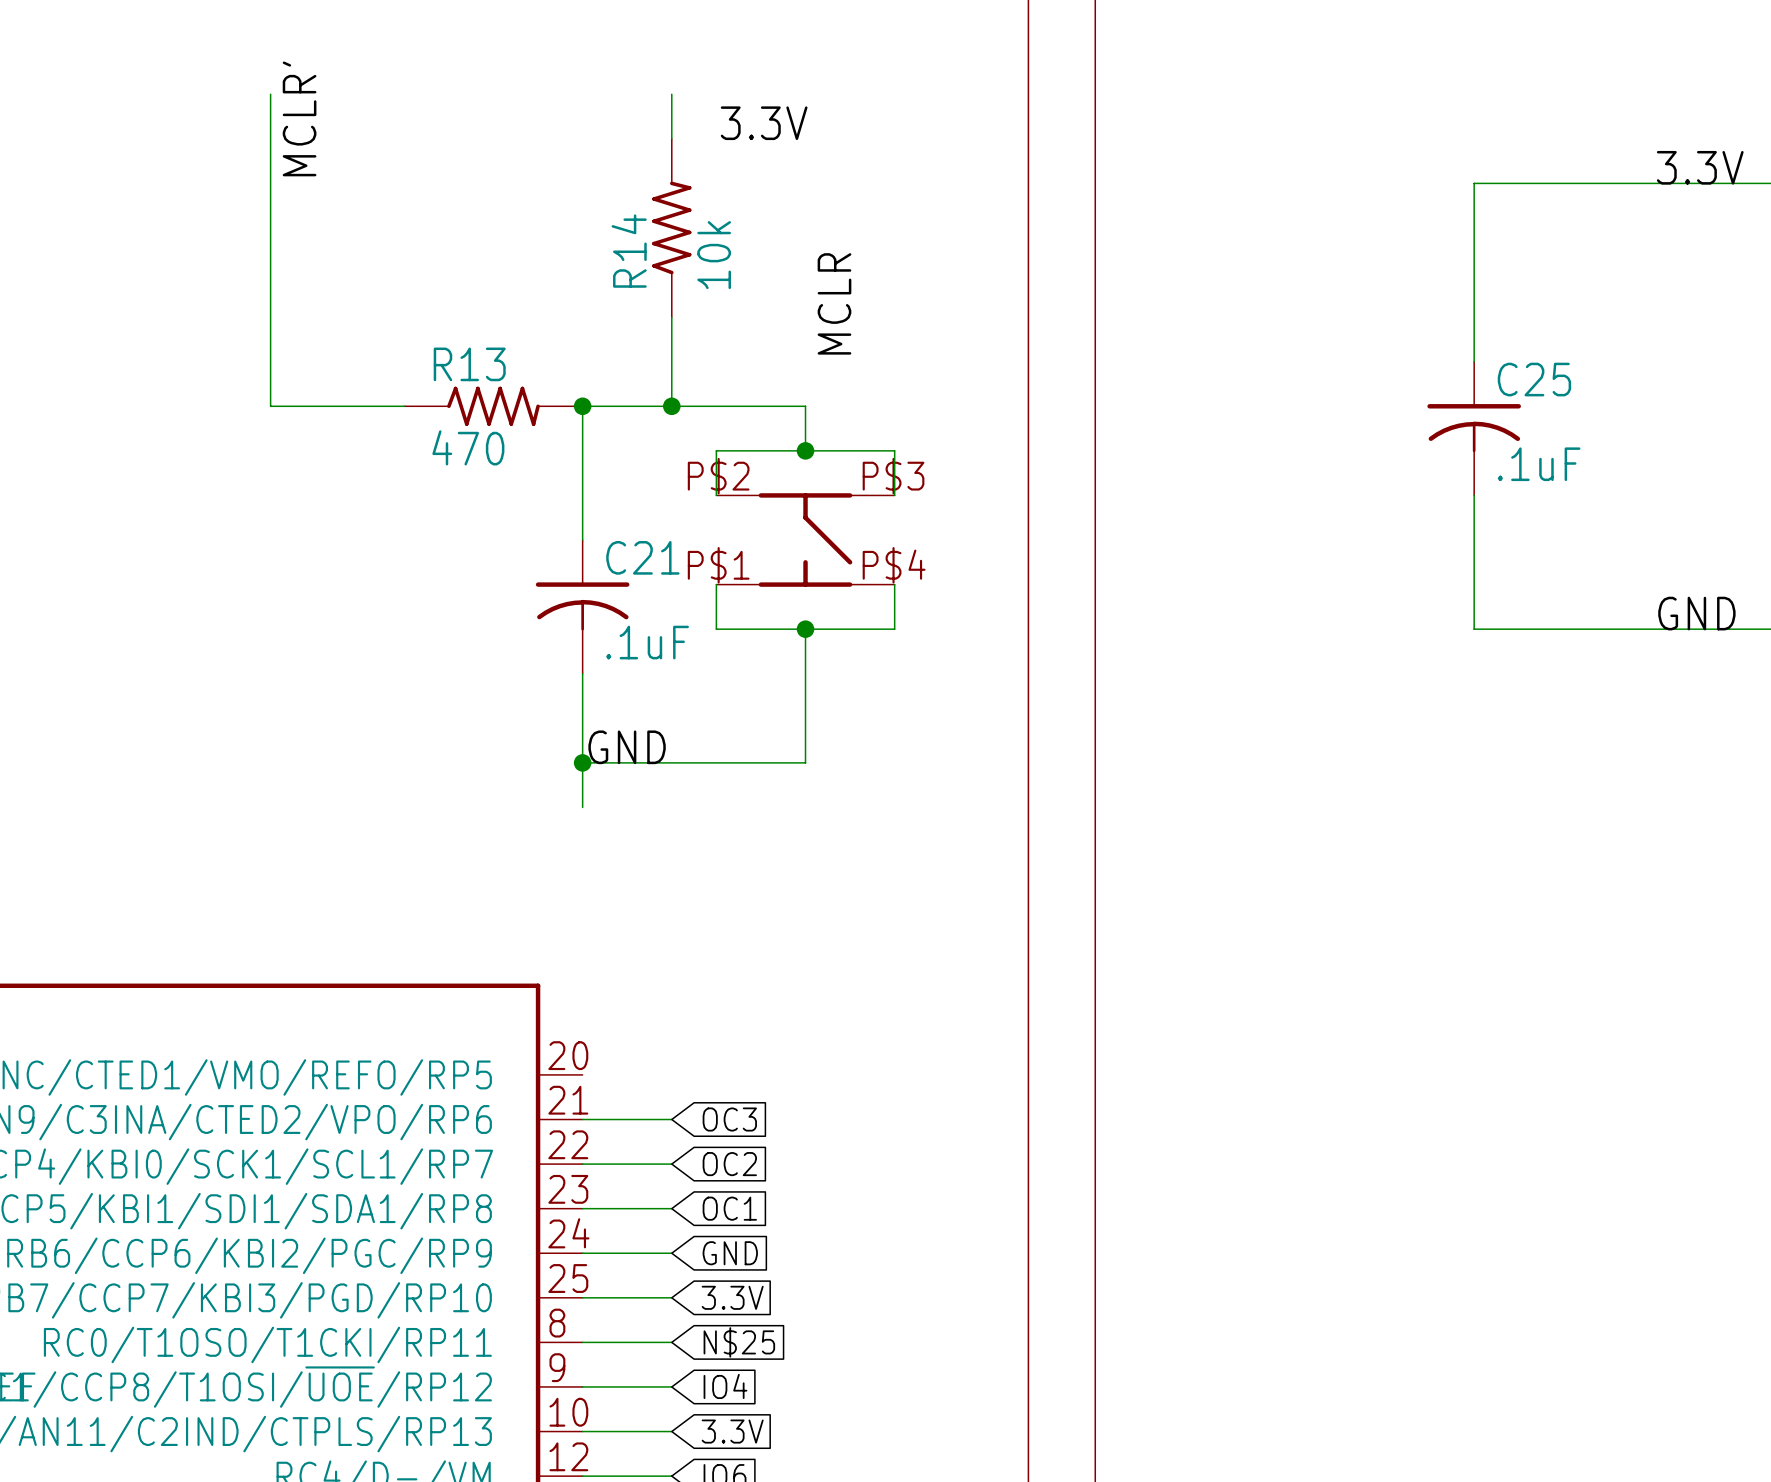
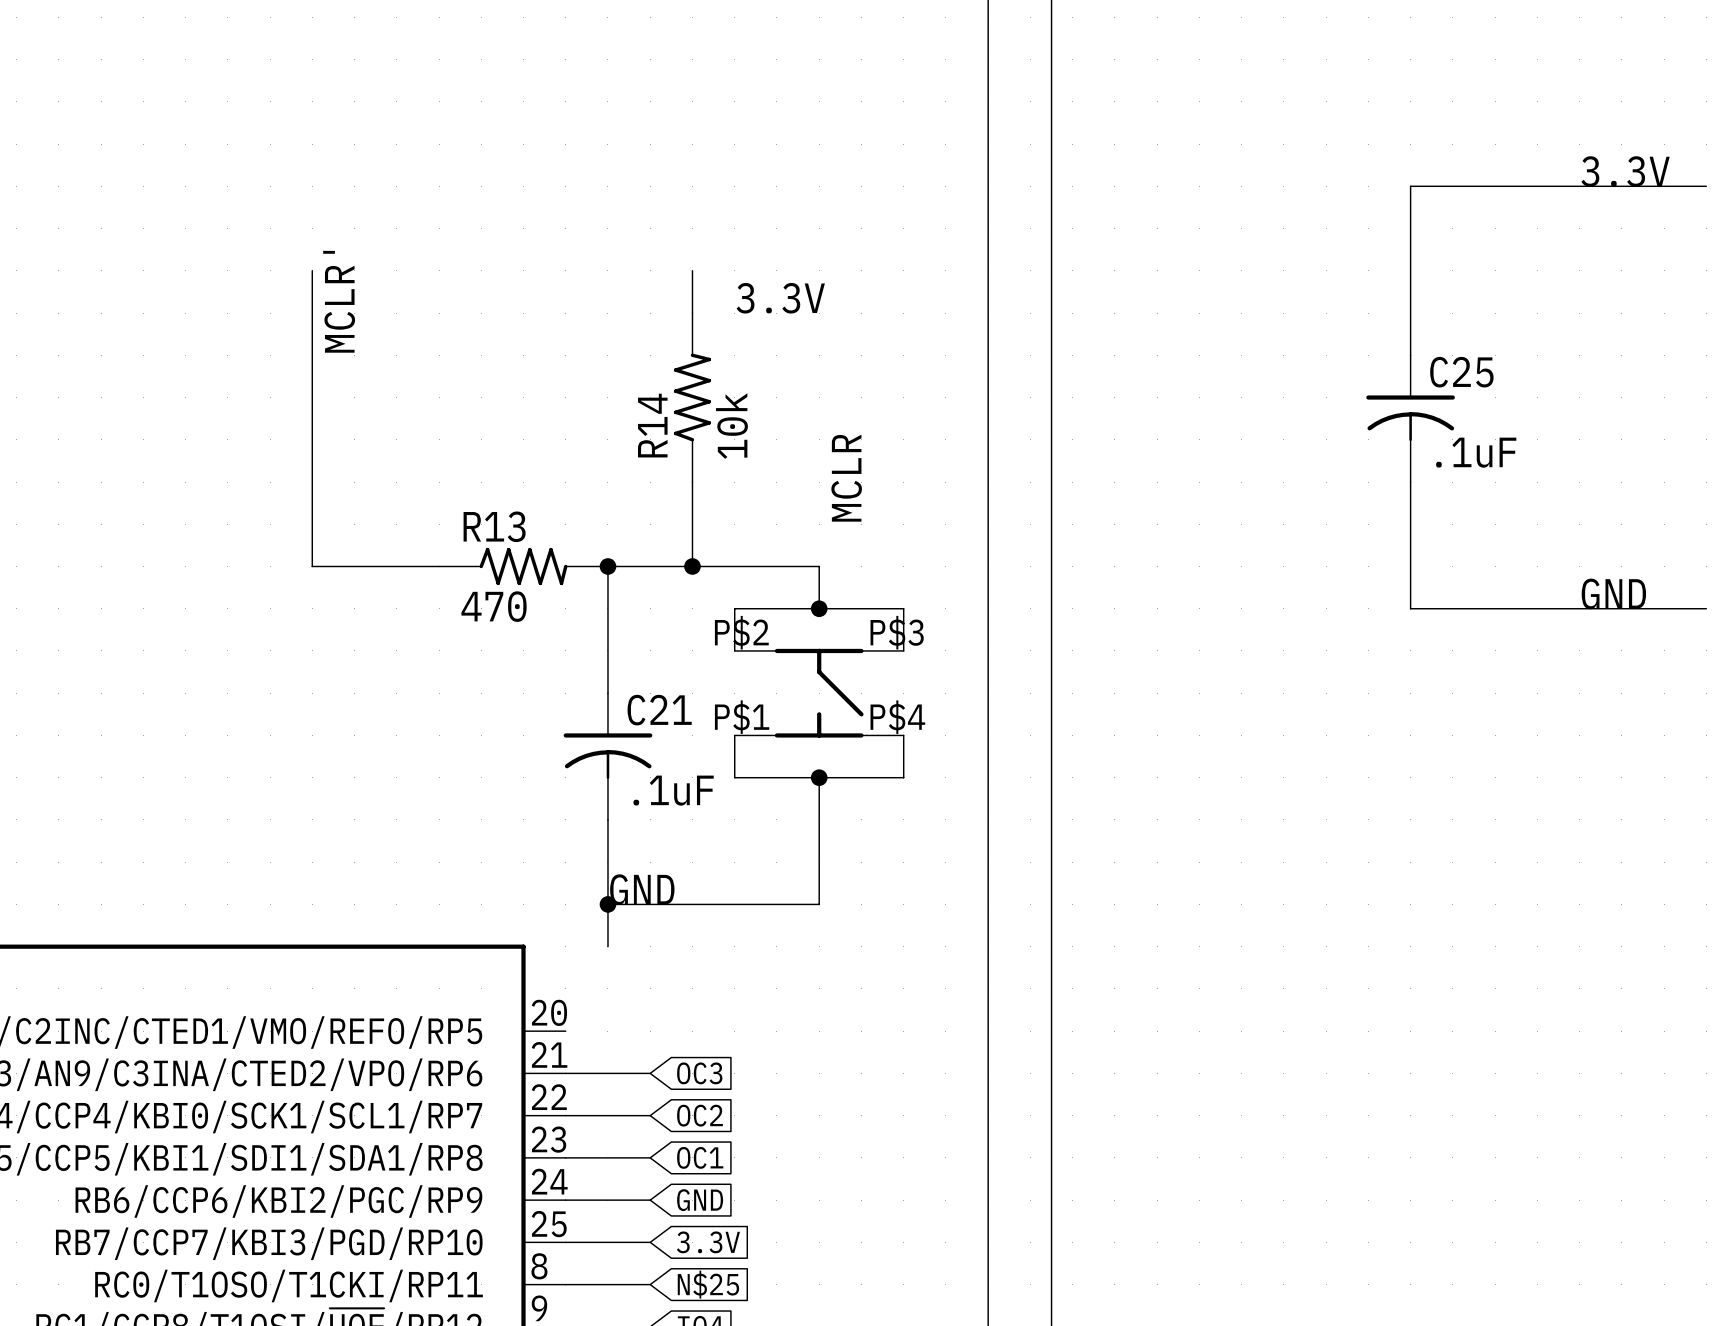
wire: (270, 94) (270, 406) (404, 406) -> (312, 270) (312, 566) (439, 566)
wire: (671, 94) (671, 138) -> (692, 270) (692, 313)
label position: MCLR' (299, 118) -> MCLR' (339, 301)
label position: 3.3V (764, 123) -> 3.3V (780, 298)
R14 position: (671, 227) -> (692, 397)
label position: MCLR (834, 303) -> MCLR (846, 478)
wire: (671, 317) (671, 406) -> none
R13 position: (493, 406) -> (523, 566)
junction: (582, 406) -> none
junction: (671, 406) -> none
wire: (805, 450) (805, 406) (582, 406) (582, 540) -> (819, 608) (819, 566) (607, 566) (607, 693)
junction: (805, 450) -> none
wire: (716, 495) (716, 450) (894, 450) (894, 495) -> (692, 482) (692, 566)
part position: (805, 540) -> (819, 693)
junction: none -> (607, 566)
wire: (716, 584) (716, 629) (760, 629) -> (734, 650) (734, 608)
junction: none -> (692, 566)
wire: (894, 584) (894, 629) -> (903, 650) (903, 608) (861, 608)
C21 position: (582, 606) -> (607, 756)
wire: (805, 629) (805, 762) (582, 762) -> (819, 777) (819, 904) (607, 904)
junction position: (805, 629) -> (819, 608)
wire: (582, 673) (582, 807) -> (607, 819) (607, 946)
label position: GND (627, 747) -> GND (642, 889)
junction: (582, 762) -> none
wire: none -> (734, 735) (734, 777) (903, 777) (903, 735)
junction: none -> (819, 777)
junction: none -> (607, 904)

